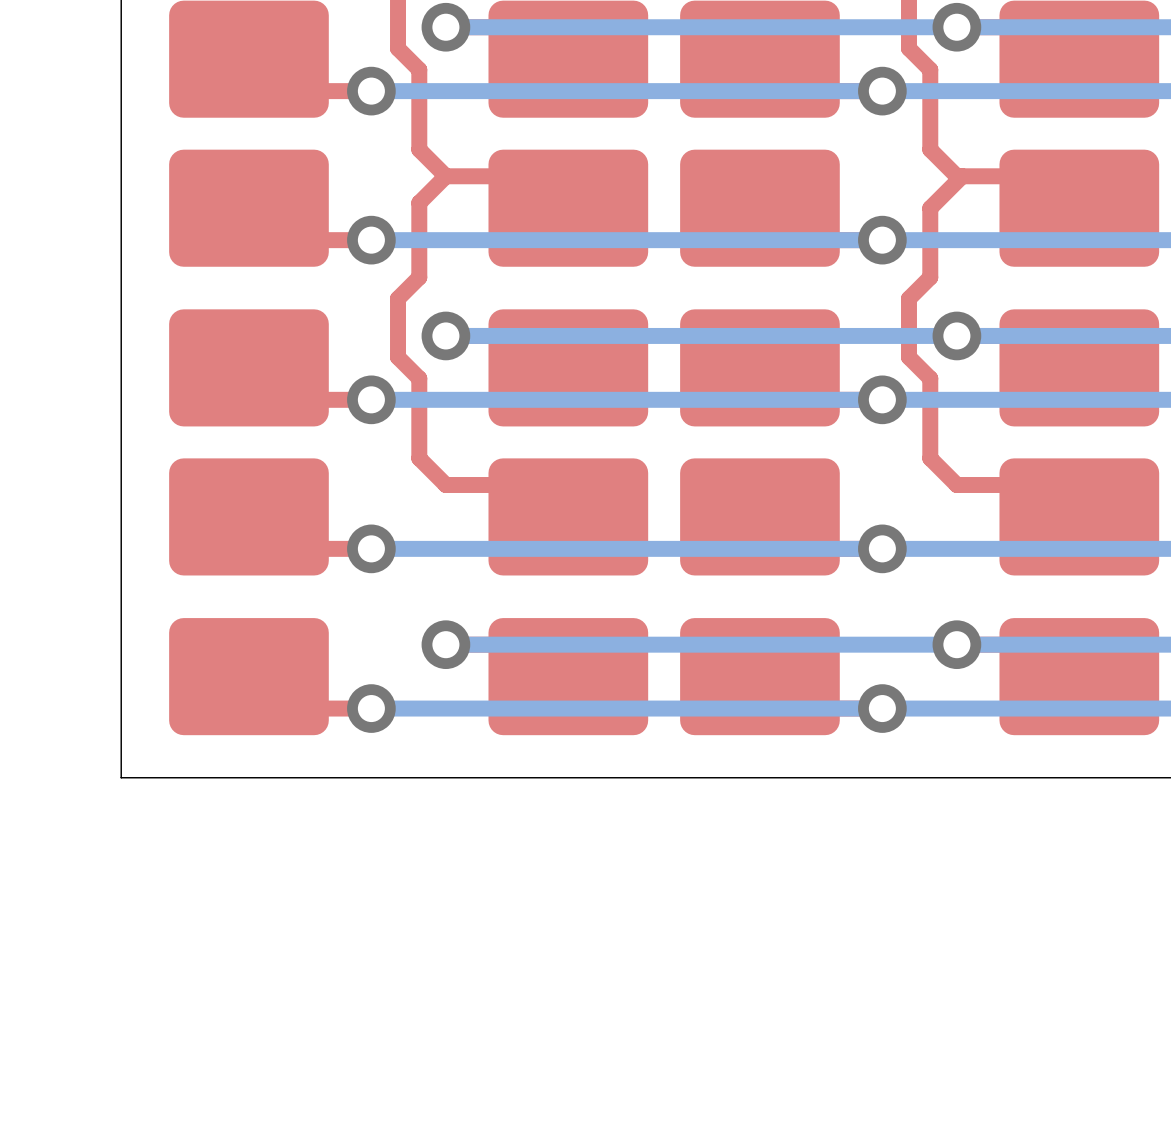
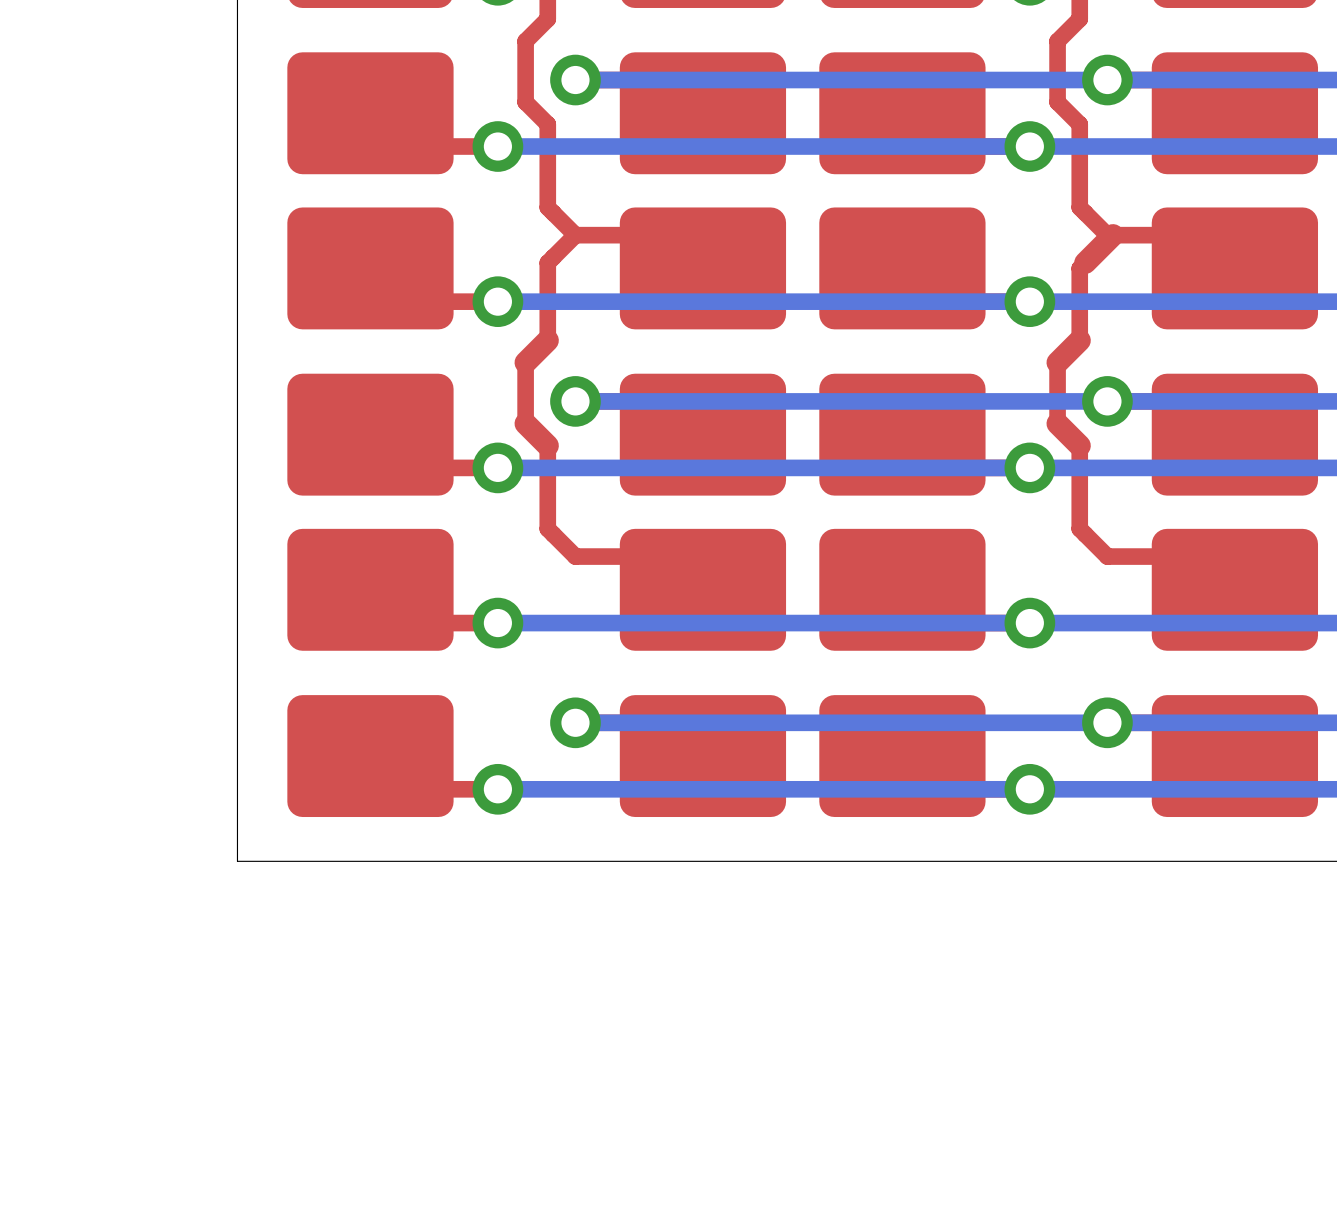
top track width: thin (962, 176) (935, 202) -> thick (1112, 235) (1085, 262)
top track width: thin (419, 277) (398, 298) -> thick (547, 340) (525, 362)
top track width: thin (930, 277) (908, 298) -> thick (1079, 340) (1057, 362)
top track width: thin (398, 357) (419, 378) -> thick (525, 423) (547, 445)
top track width: thin (908, 357) (930, 378) -> thick (1057, 423) (1079, 445)

